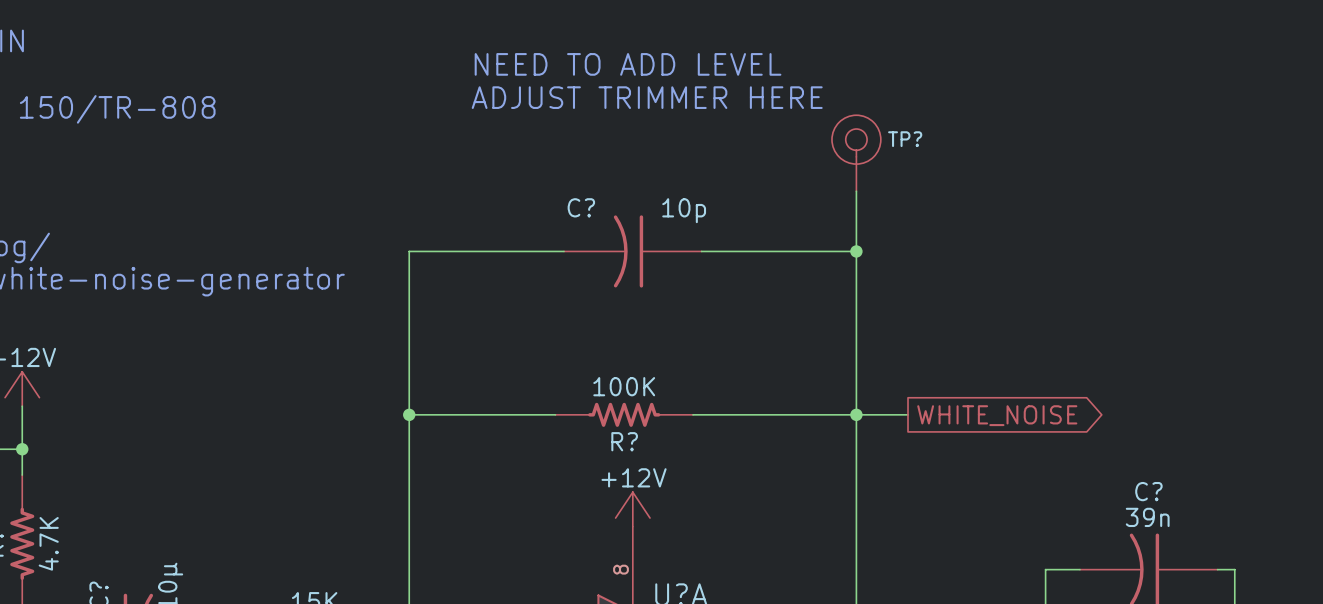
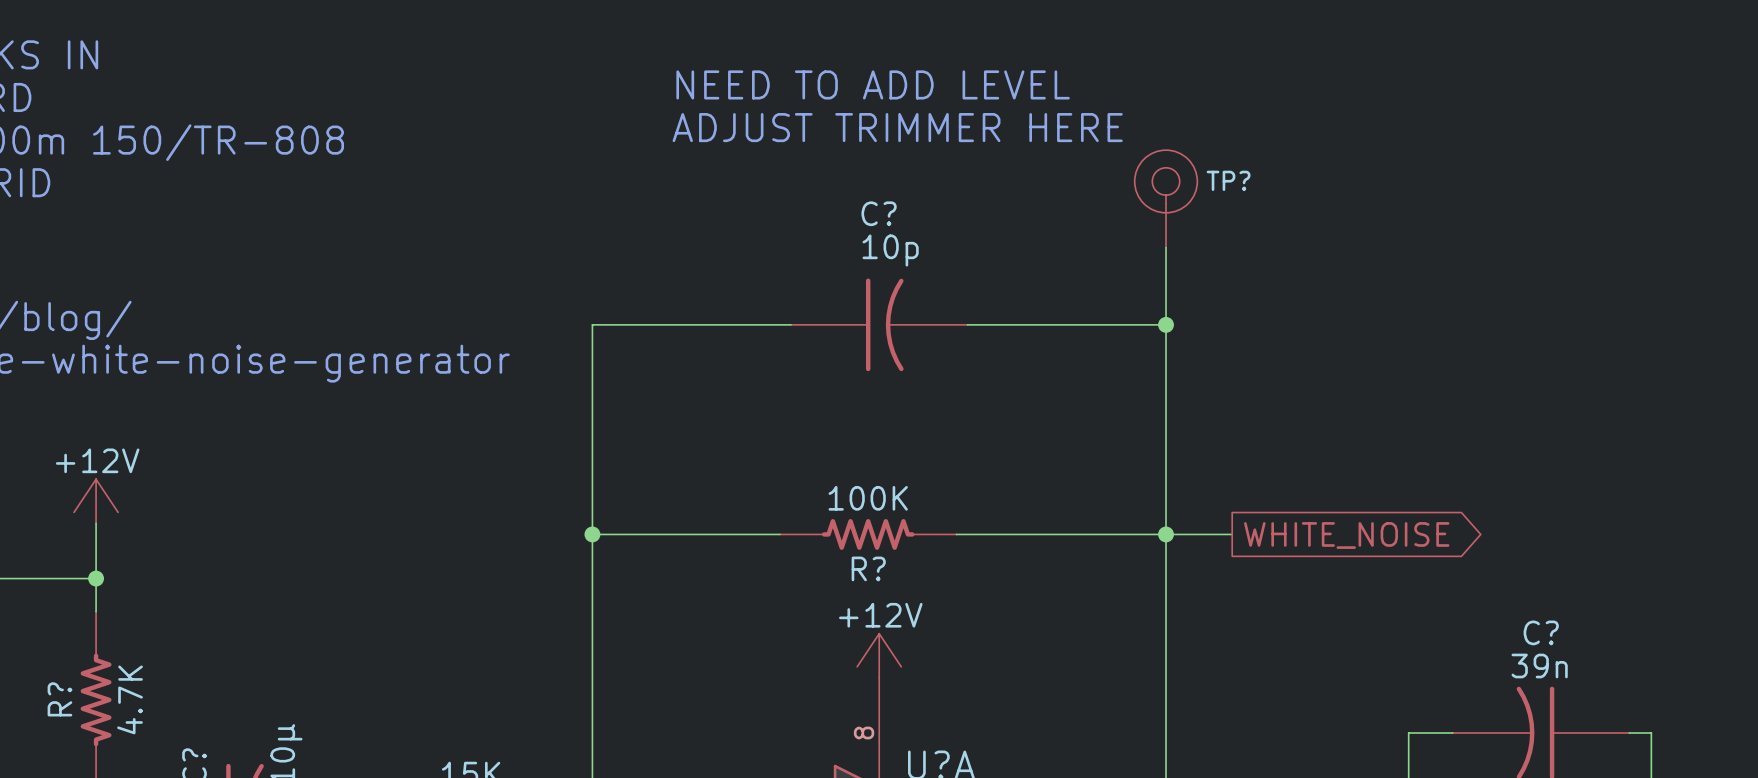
C? name position: C? (581, 207) -> C? (879, 213)
C? value position: 10p (684, 210) -> 10p (890, 250)
C? rotation: 0° (628, 251) -> 180° (884, 324)

